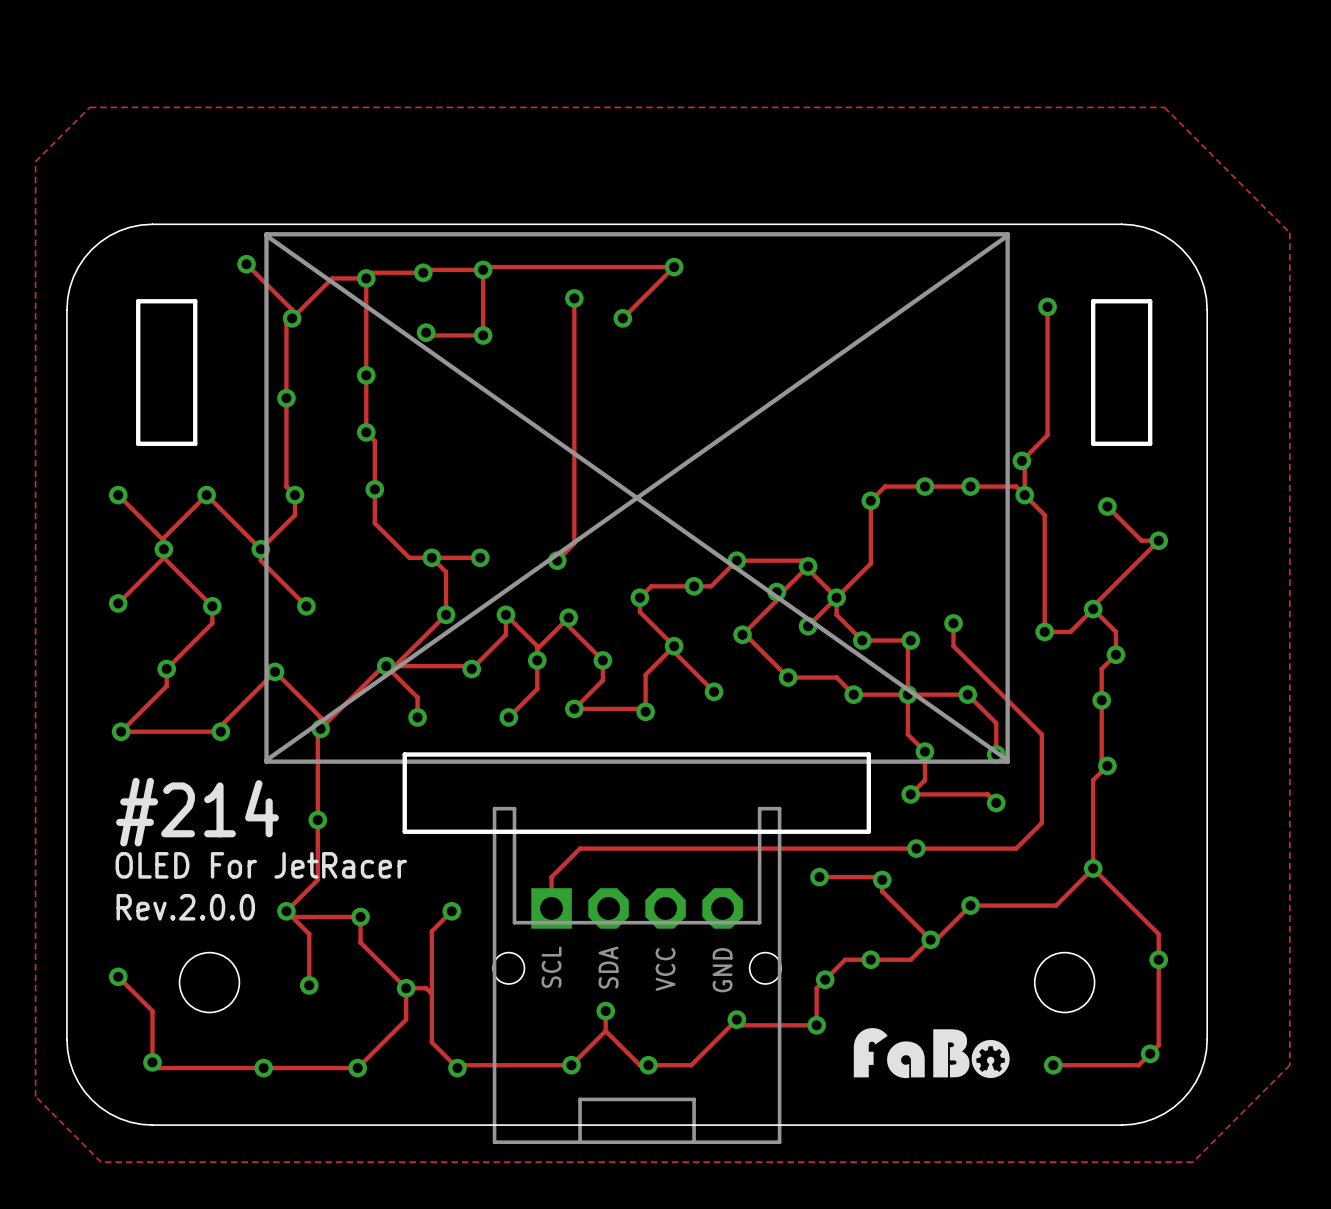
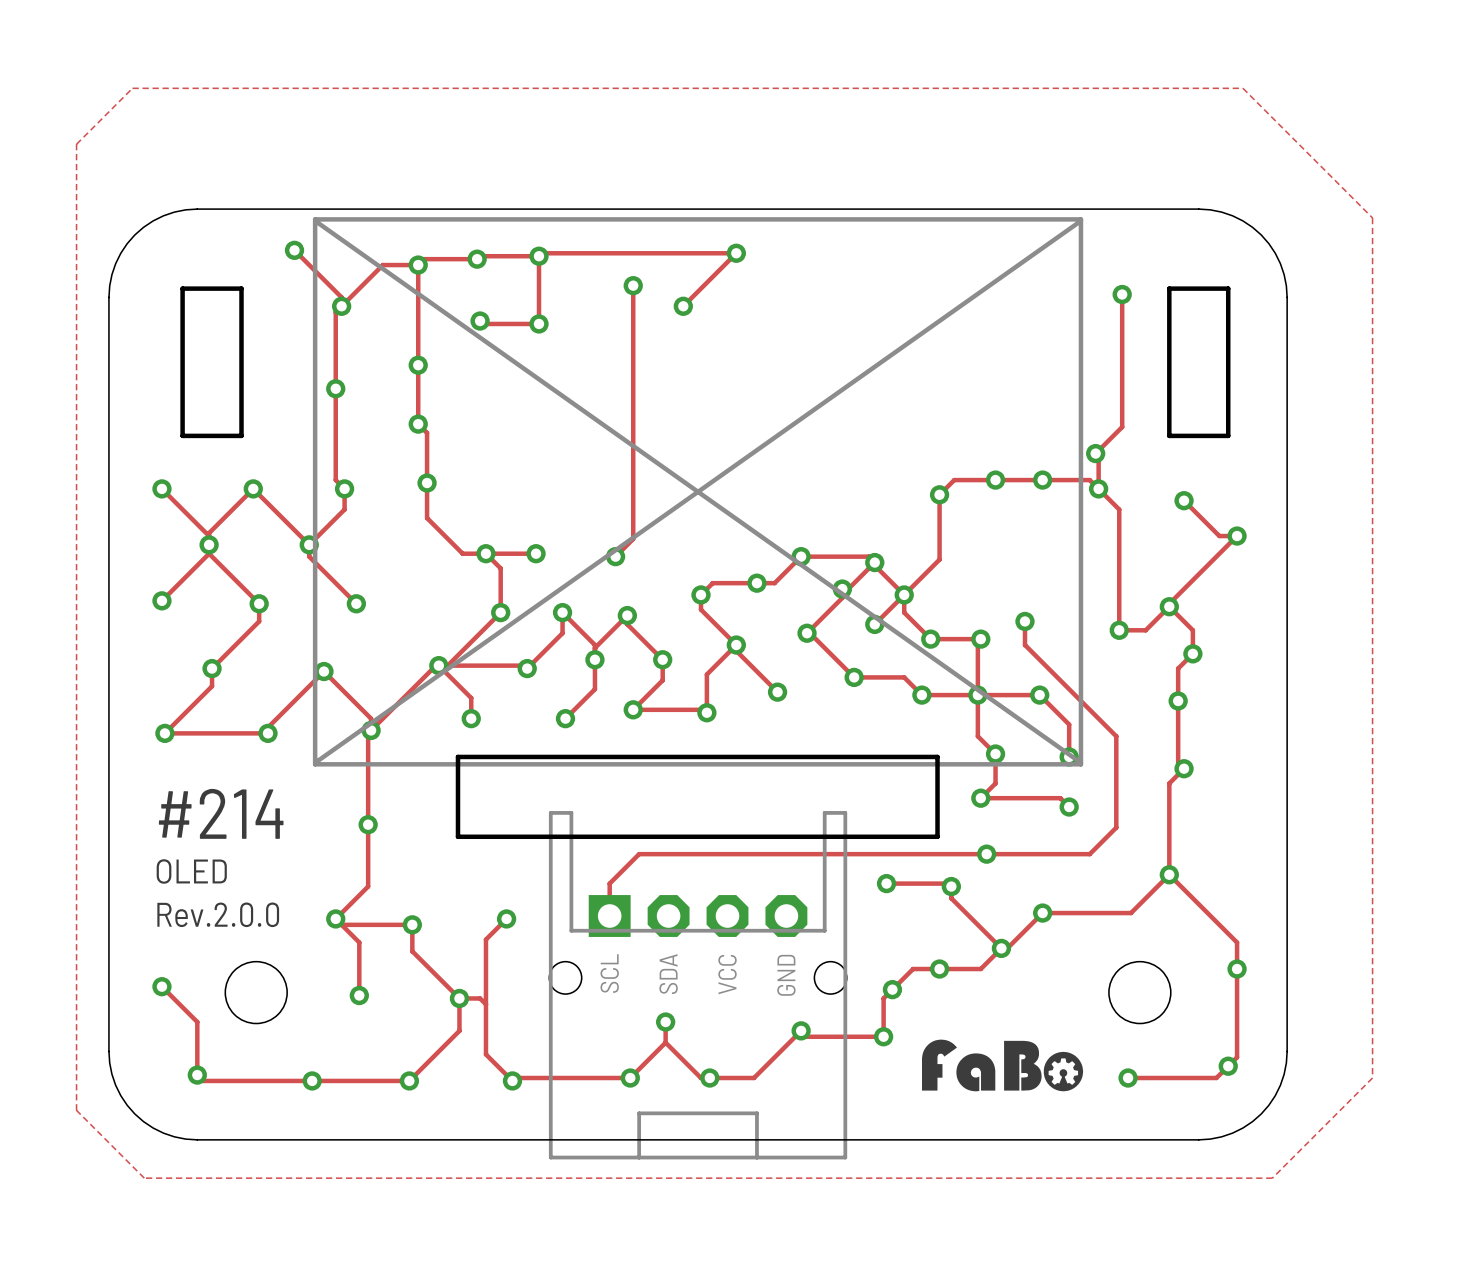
text: OLED For JetRacer (261, 865) -> OLED (191, 871)

